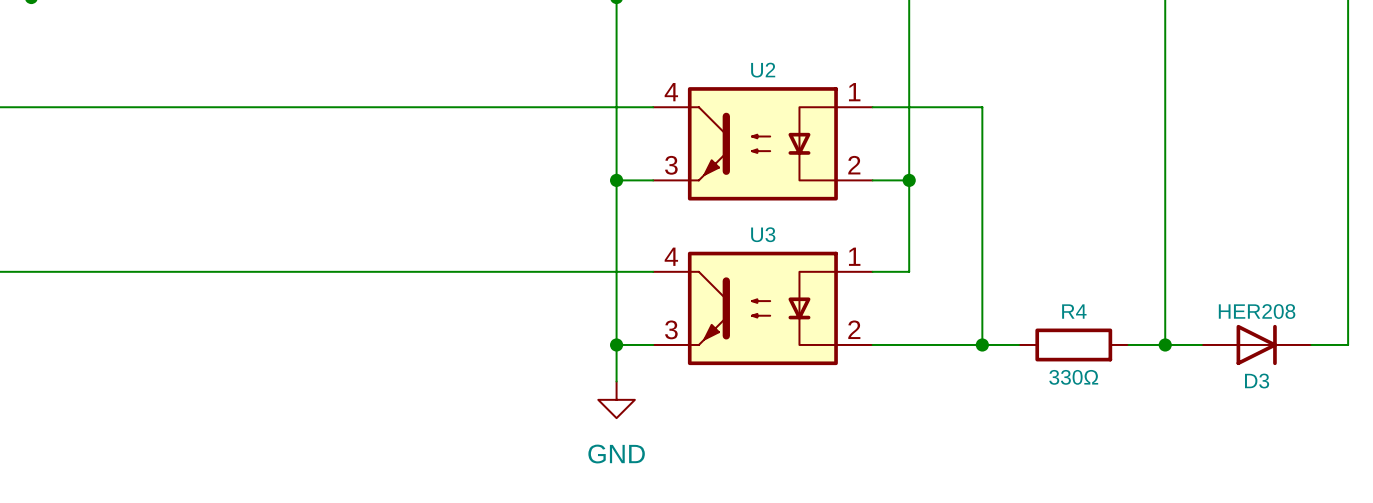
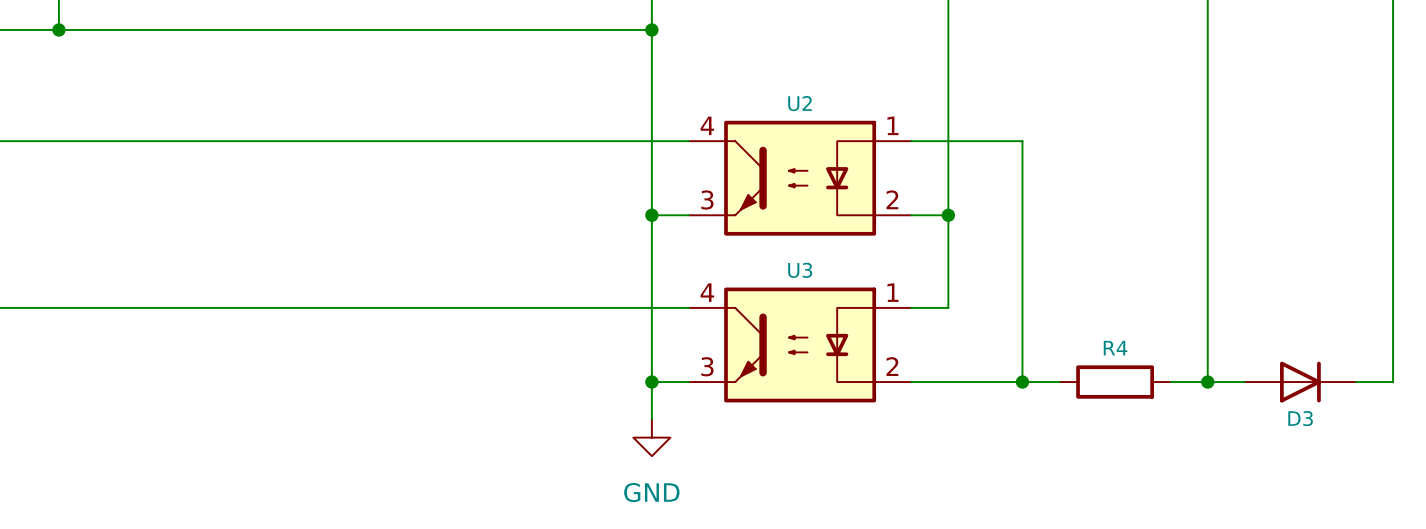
D3 value: HER208 (1257, 311) -> none
R4 value: 330Ω (1073, 377) -> none

